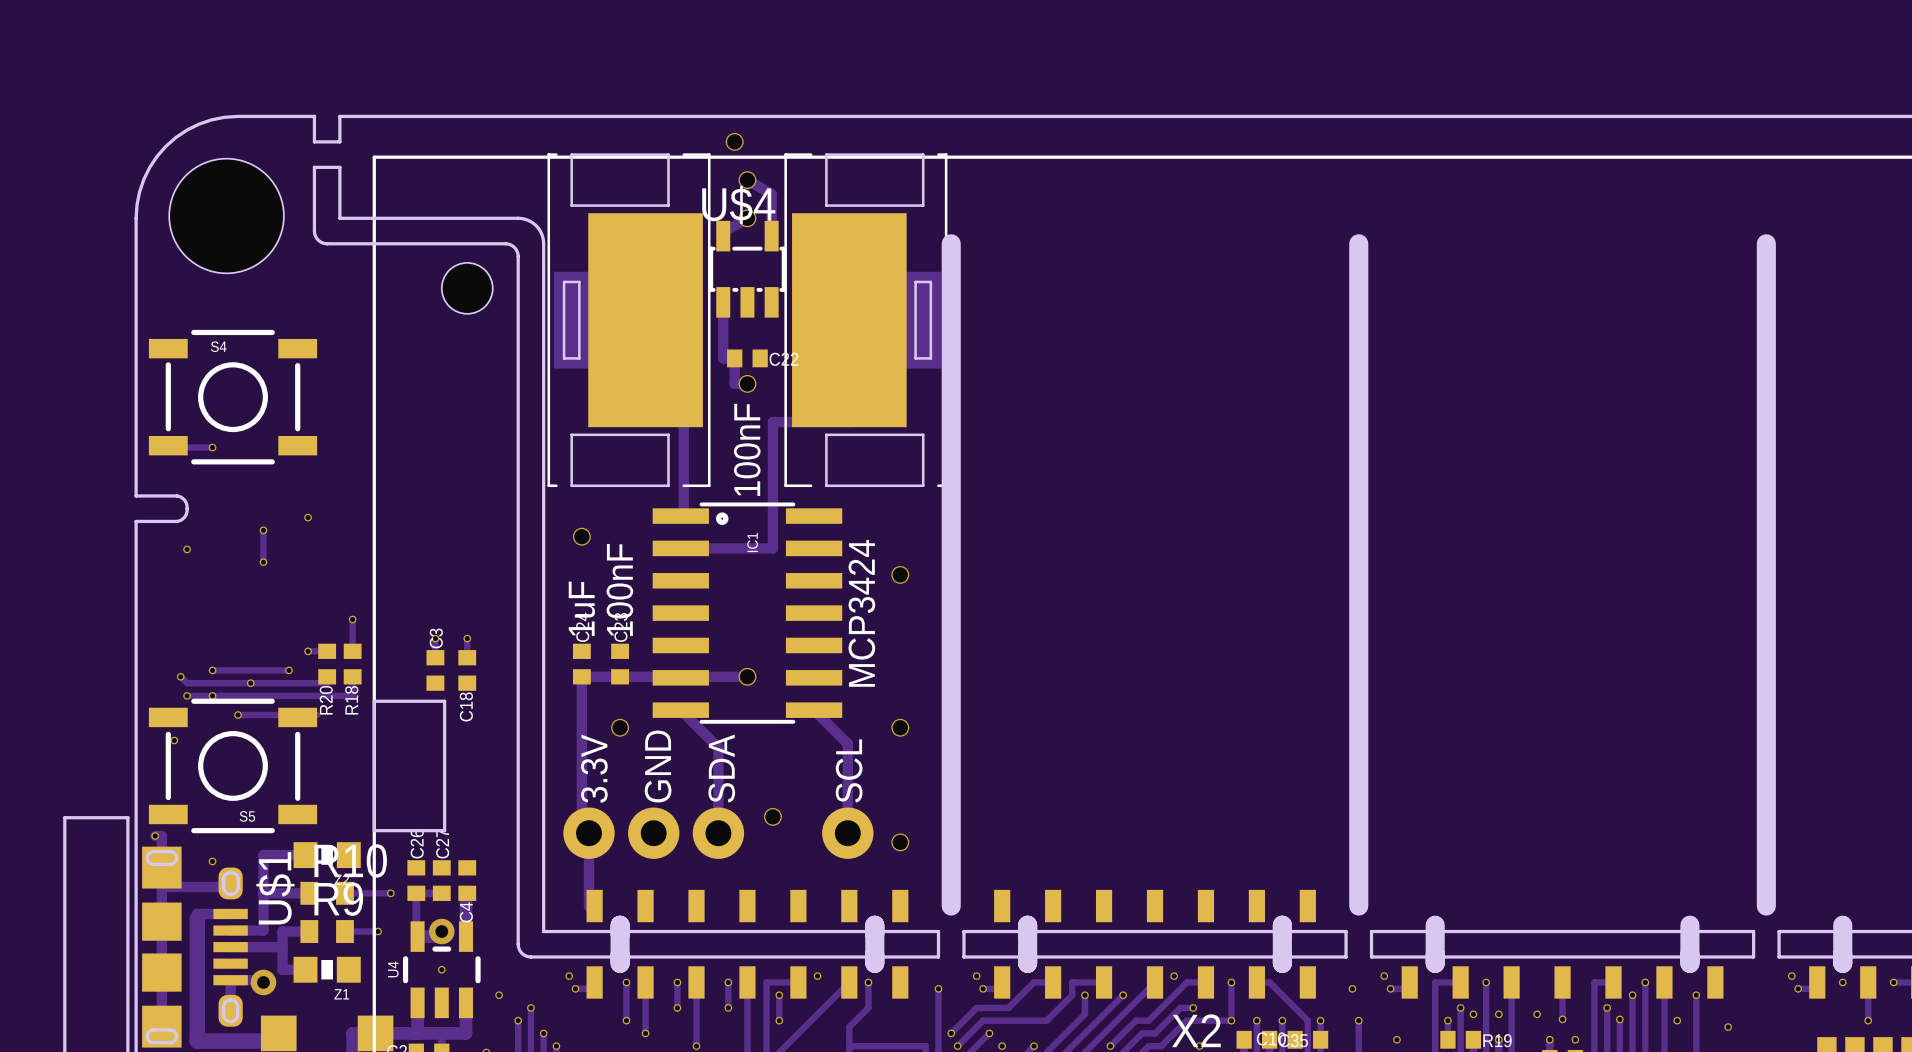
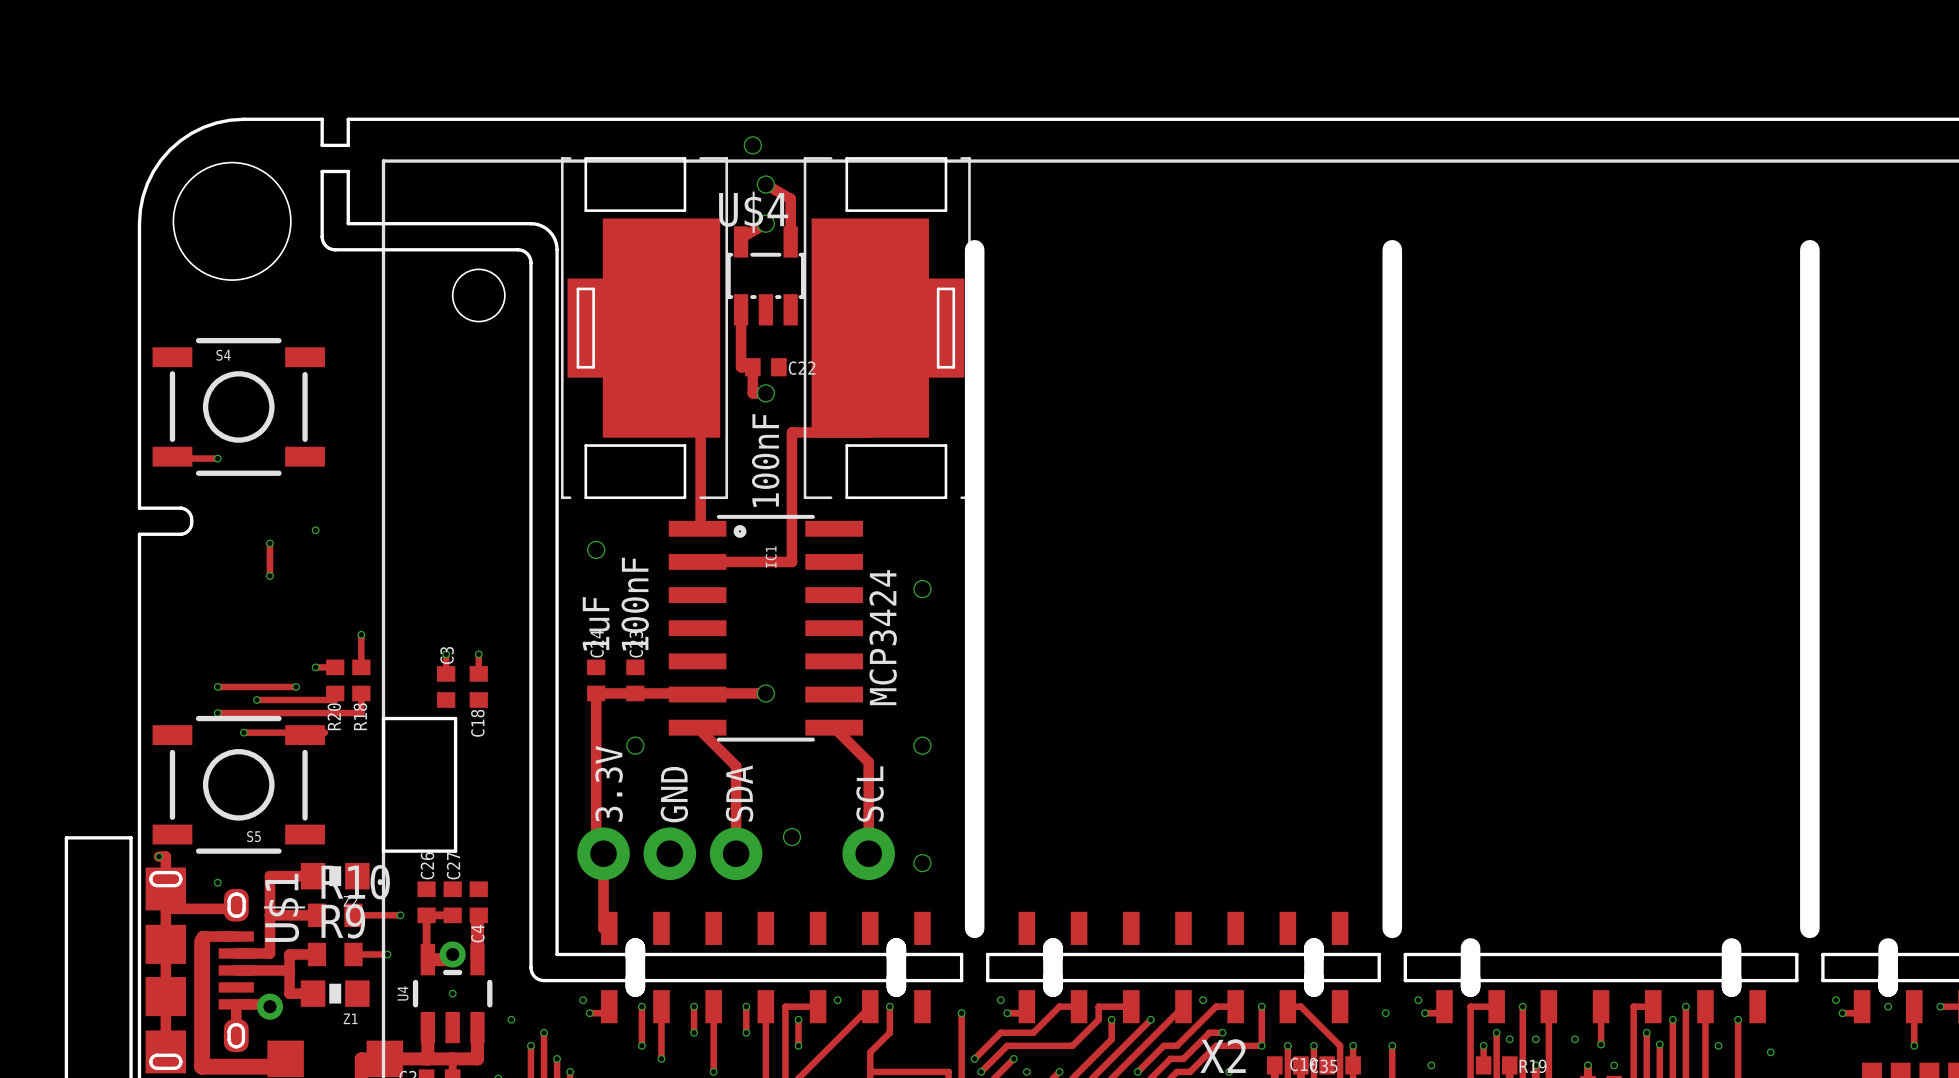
via: (187, 549) -> none
track: (180, 676) (187, 683) (250, 683) -> none
via: (180, 676) -> none
track: (187, 695) (212, 695) -> none
via: (187, 695) -> none
via: (174, 740) -> none

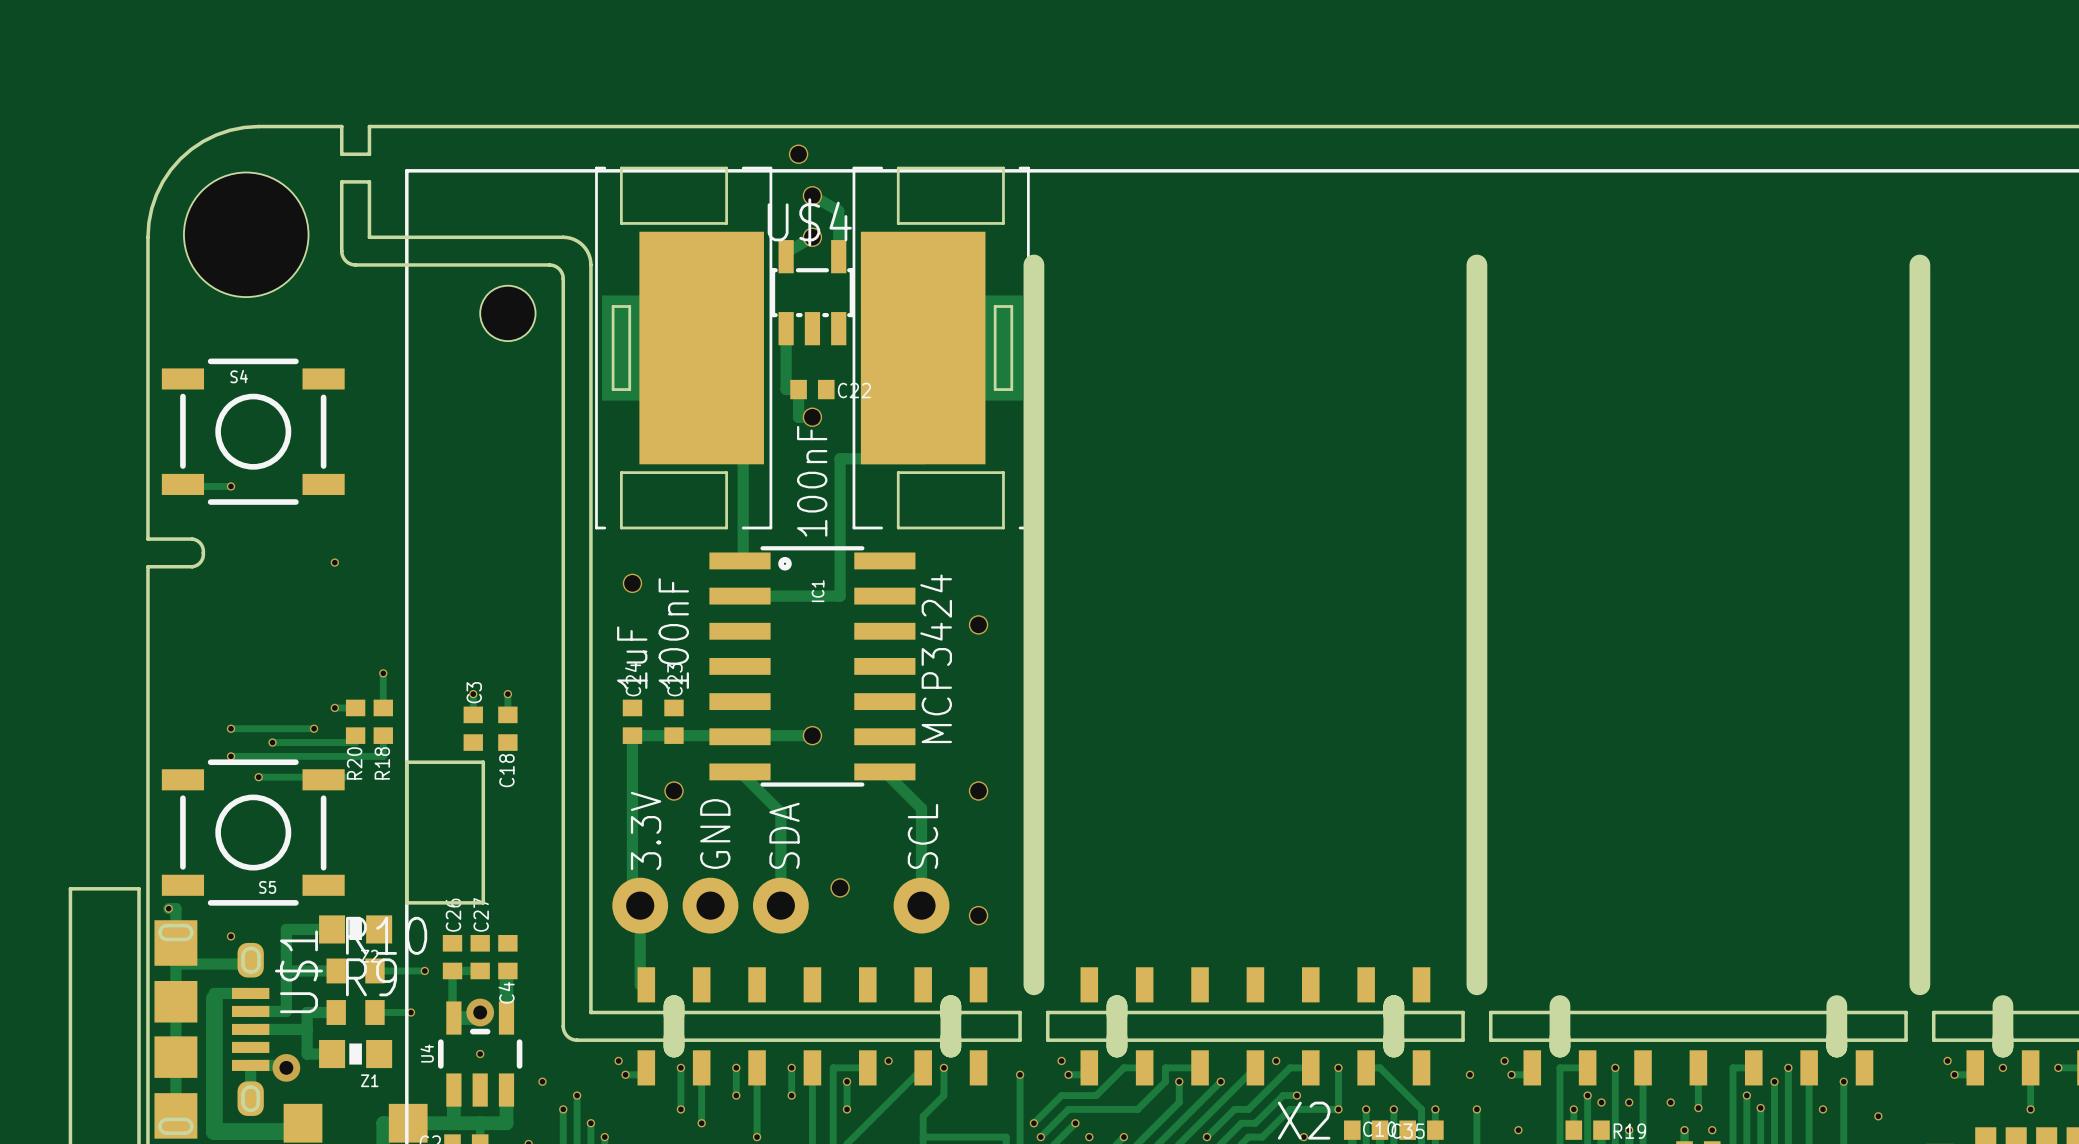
track: (269, 543) (269, 576) -> none
via: (269, 543) -> none
via: (269, 576) -> none

